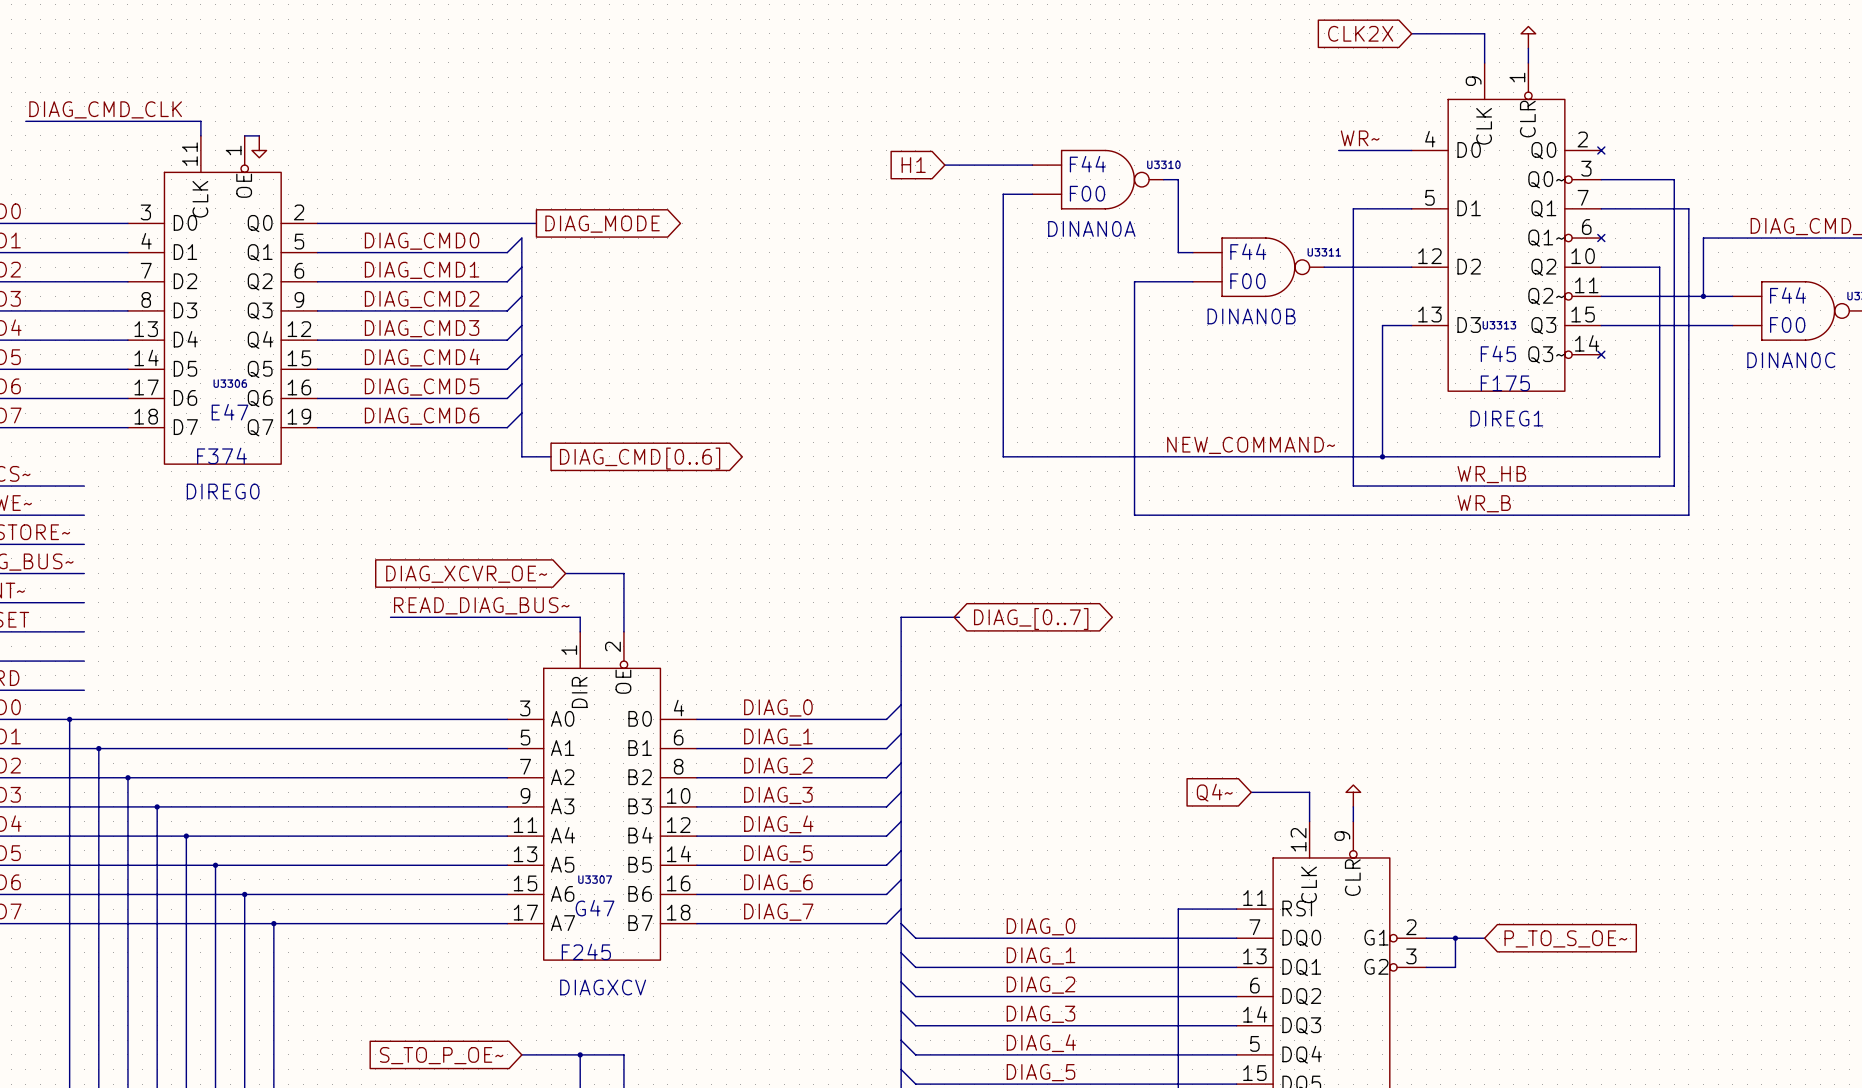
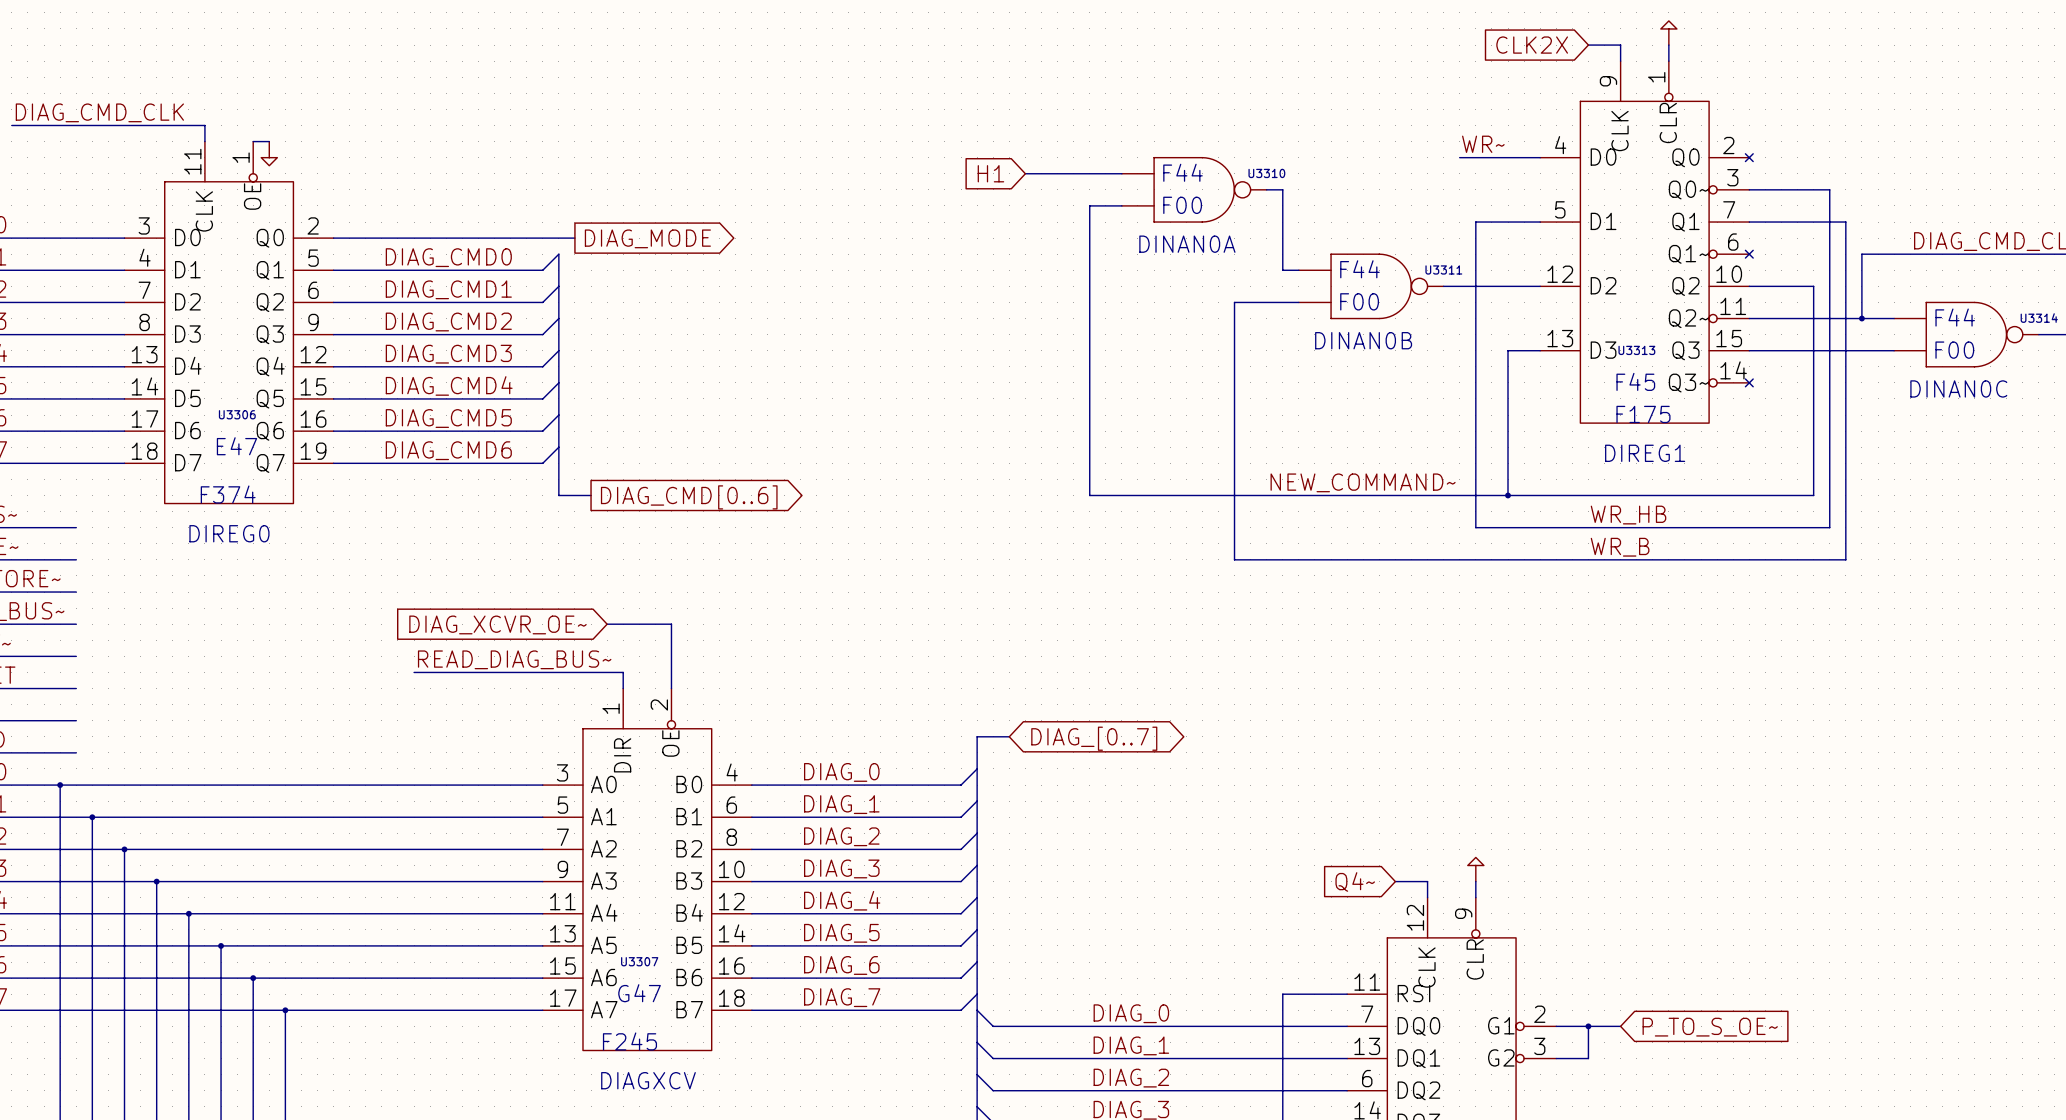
global label position: CLK2X (1360, 33) -> CLK2X (1532, 45)
wire: (1411, 33) (1484, 33) (1484, 48) -> (1588, 45) (1620, 45)
bus: (959, 617) (901, 617) (901, 675) -> (1009, 736) (977, 736)
global label position: DIAG_[0..7] (1031, 619) -> DIAG_[0..7] (1094, 738)
global label position: Q4~ (1214, 792) -> Q4~ (1355, 881)
wire: (1251, 792) (1309, 792) (1309, 806) -> (1395, 881) (1427, 881)

